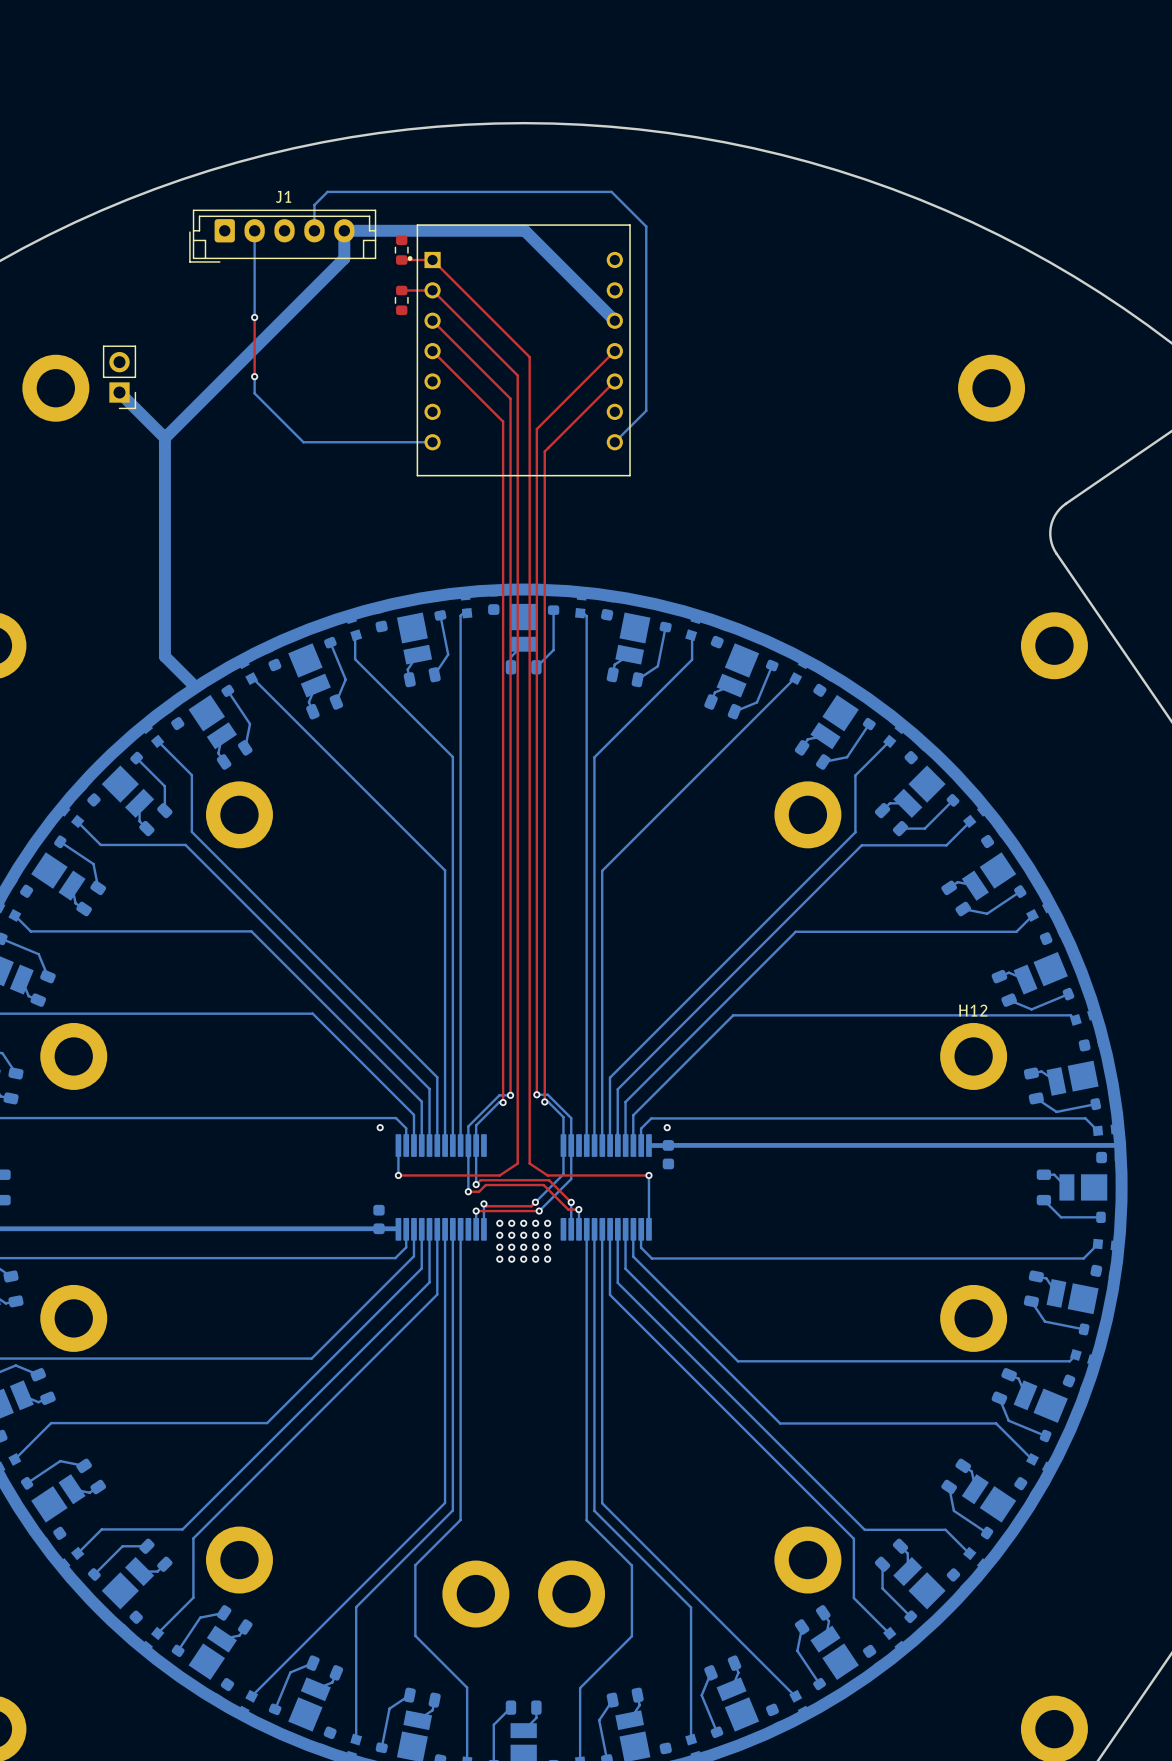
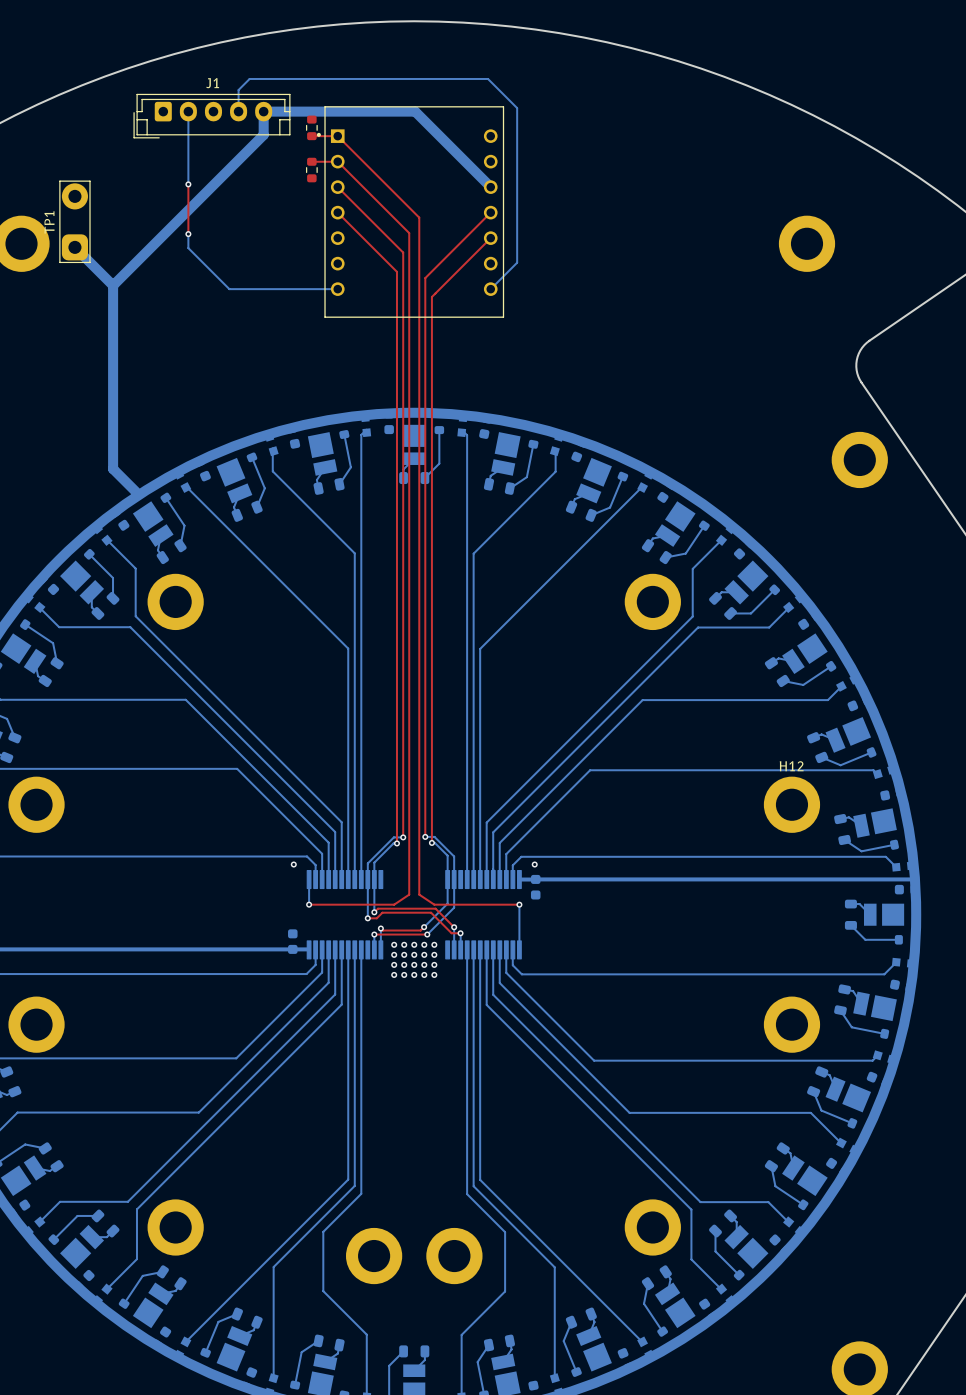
TP1: none -> (74, 221)
part: (119, 377) -> none

